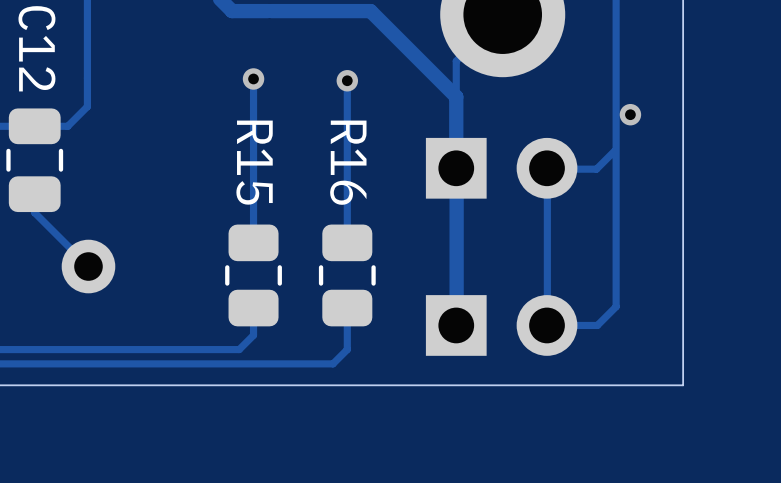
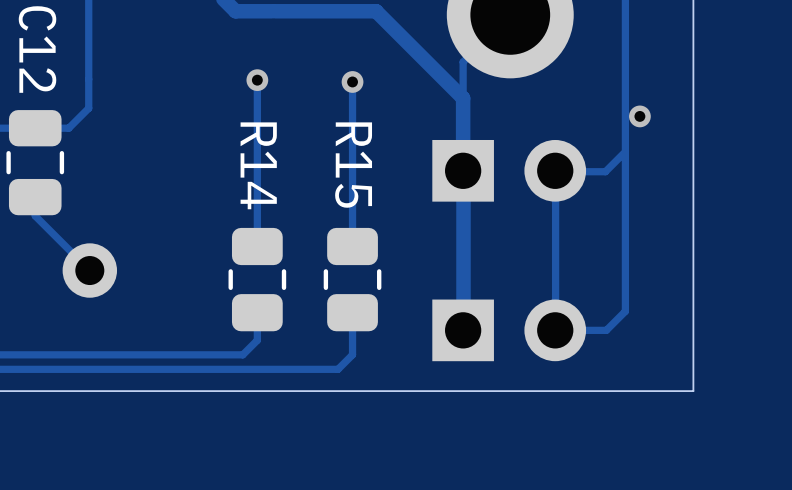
R15 name: R15 (254, 162) -> R14 (258, 165)
R16 name: R16 (348, 162) -> R15 (353, 165)

